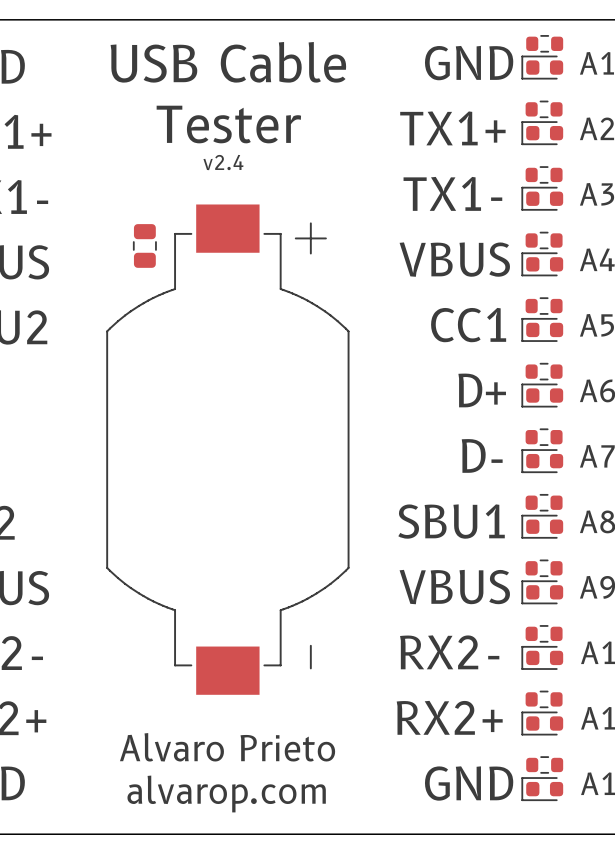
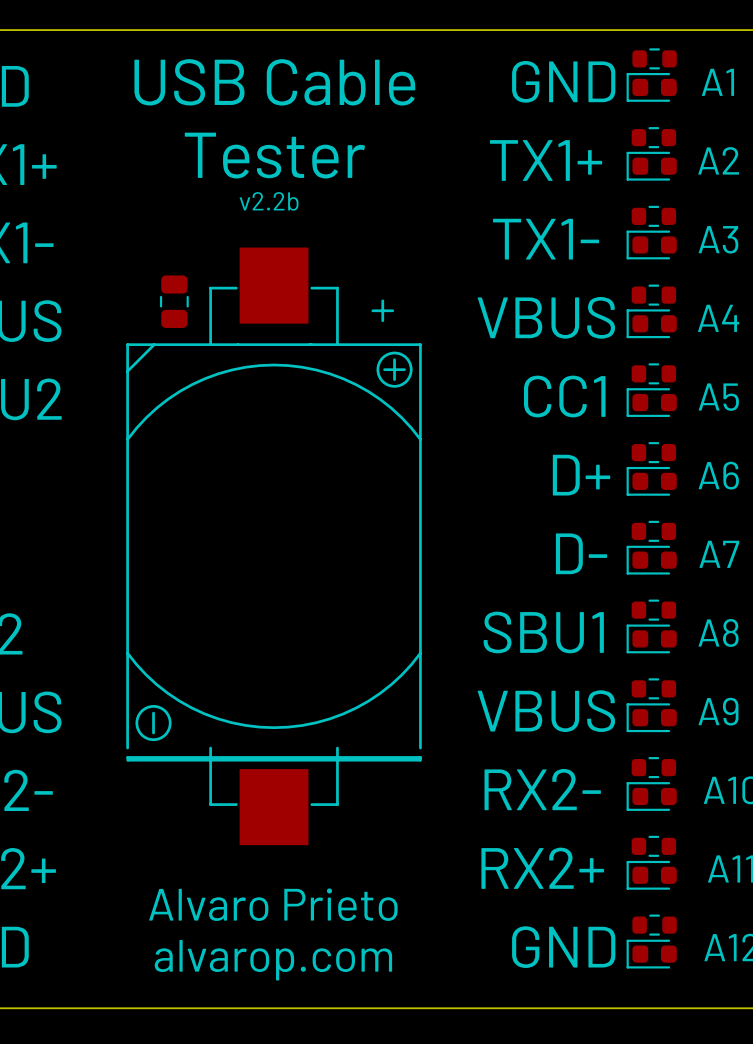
text: v2.4 (223, 162) -> v2.2b (269, 201)
part footprint: [106, 204, 350, 695] -> [126, 247, 422, 846]

